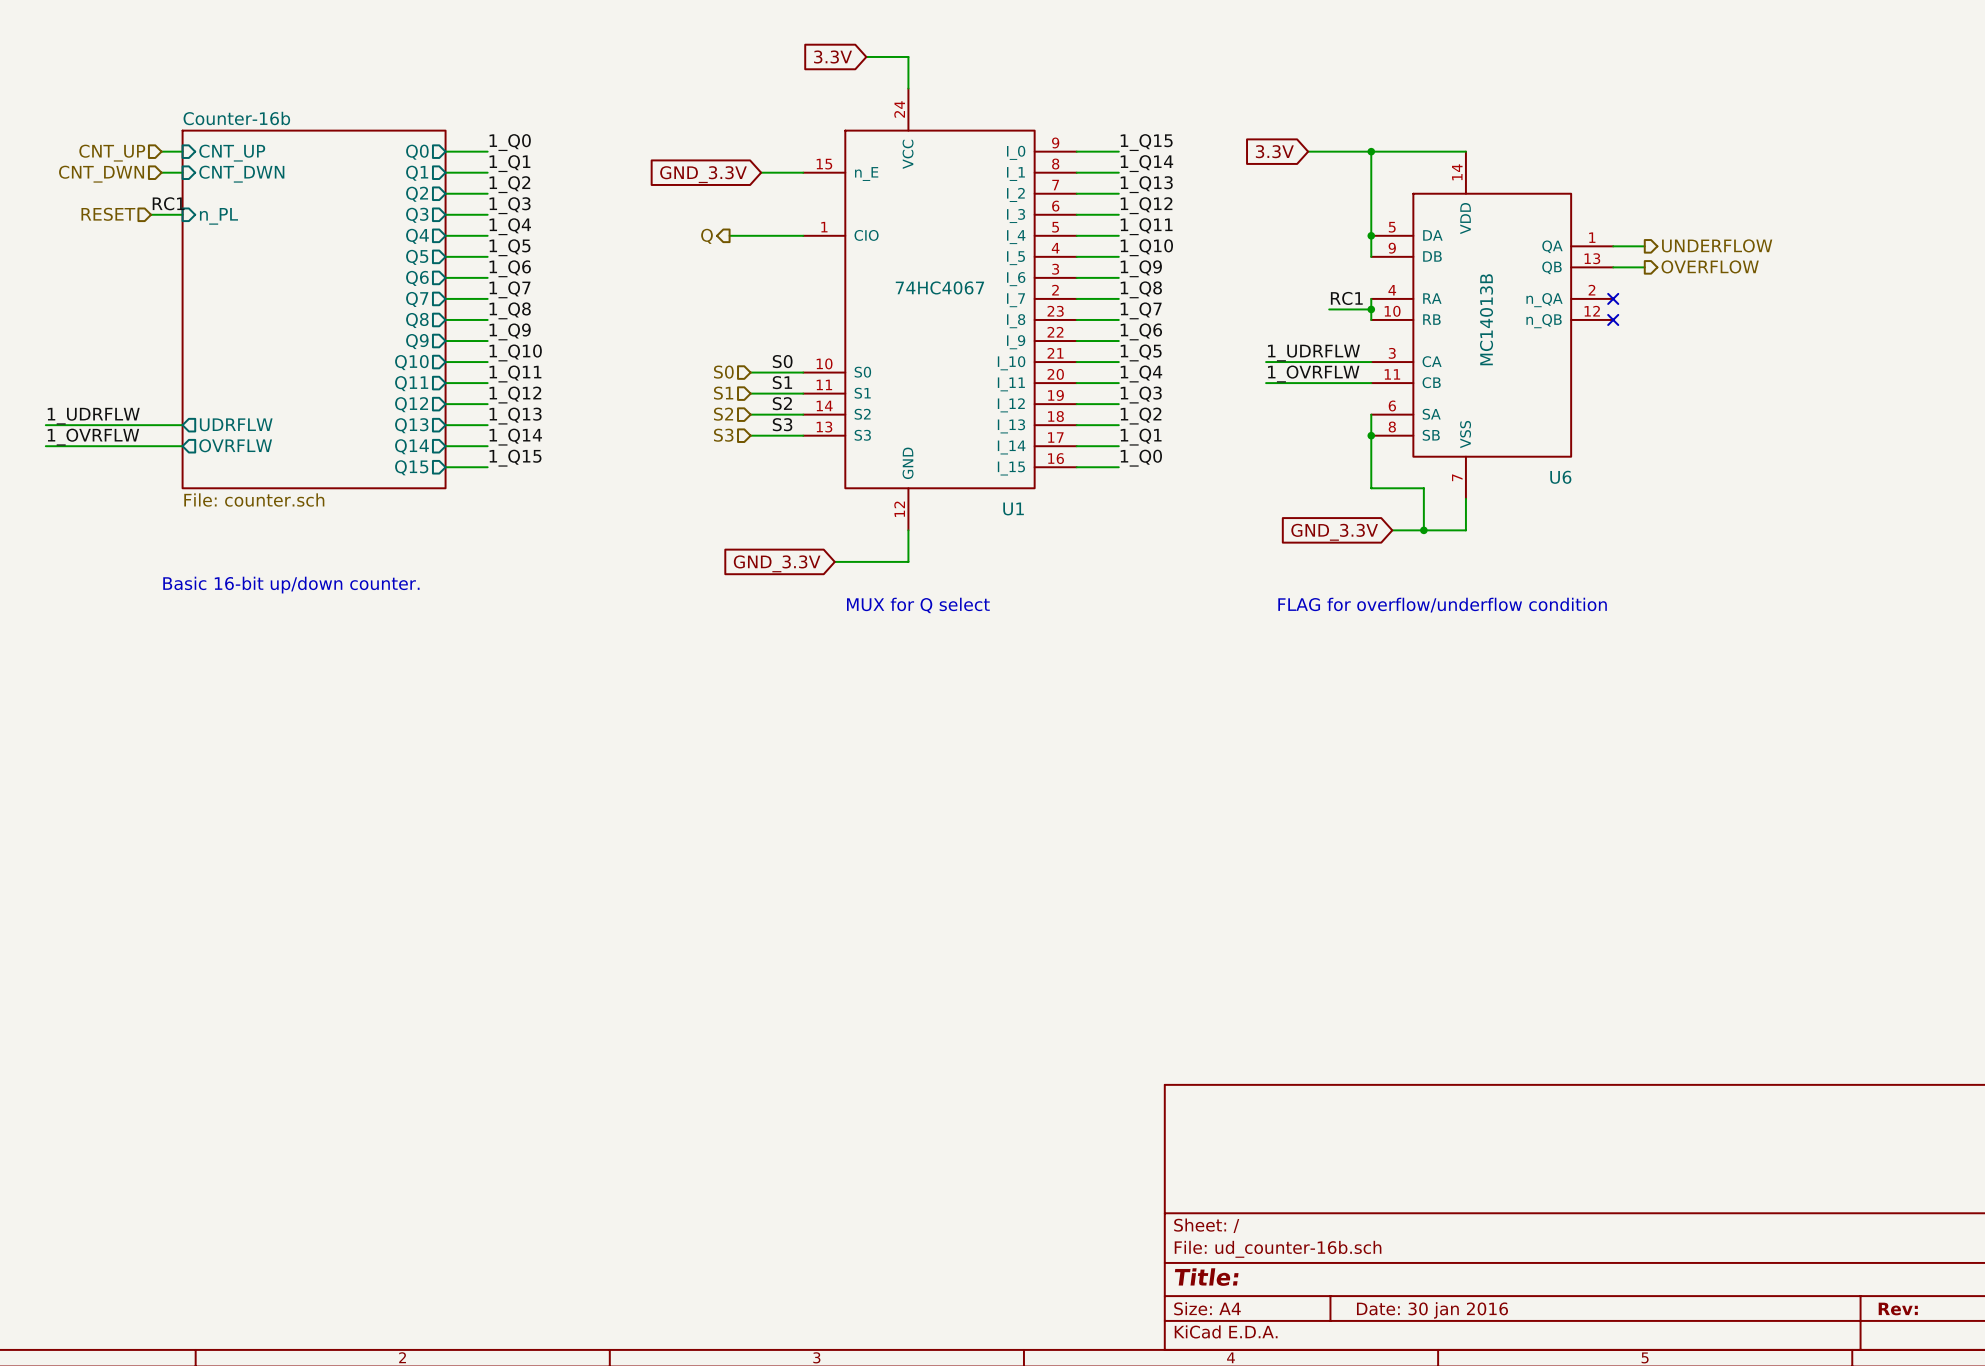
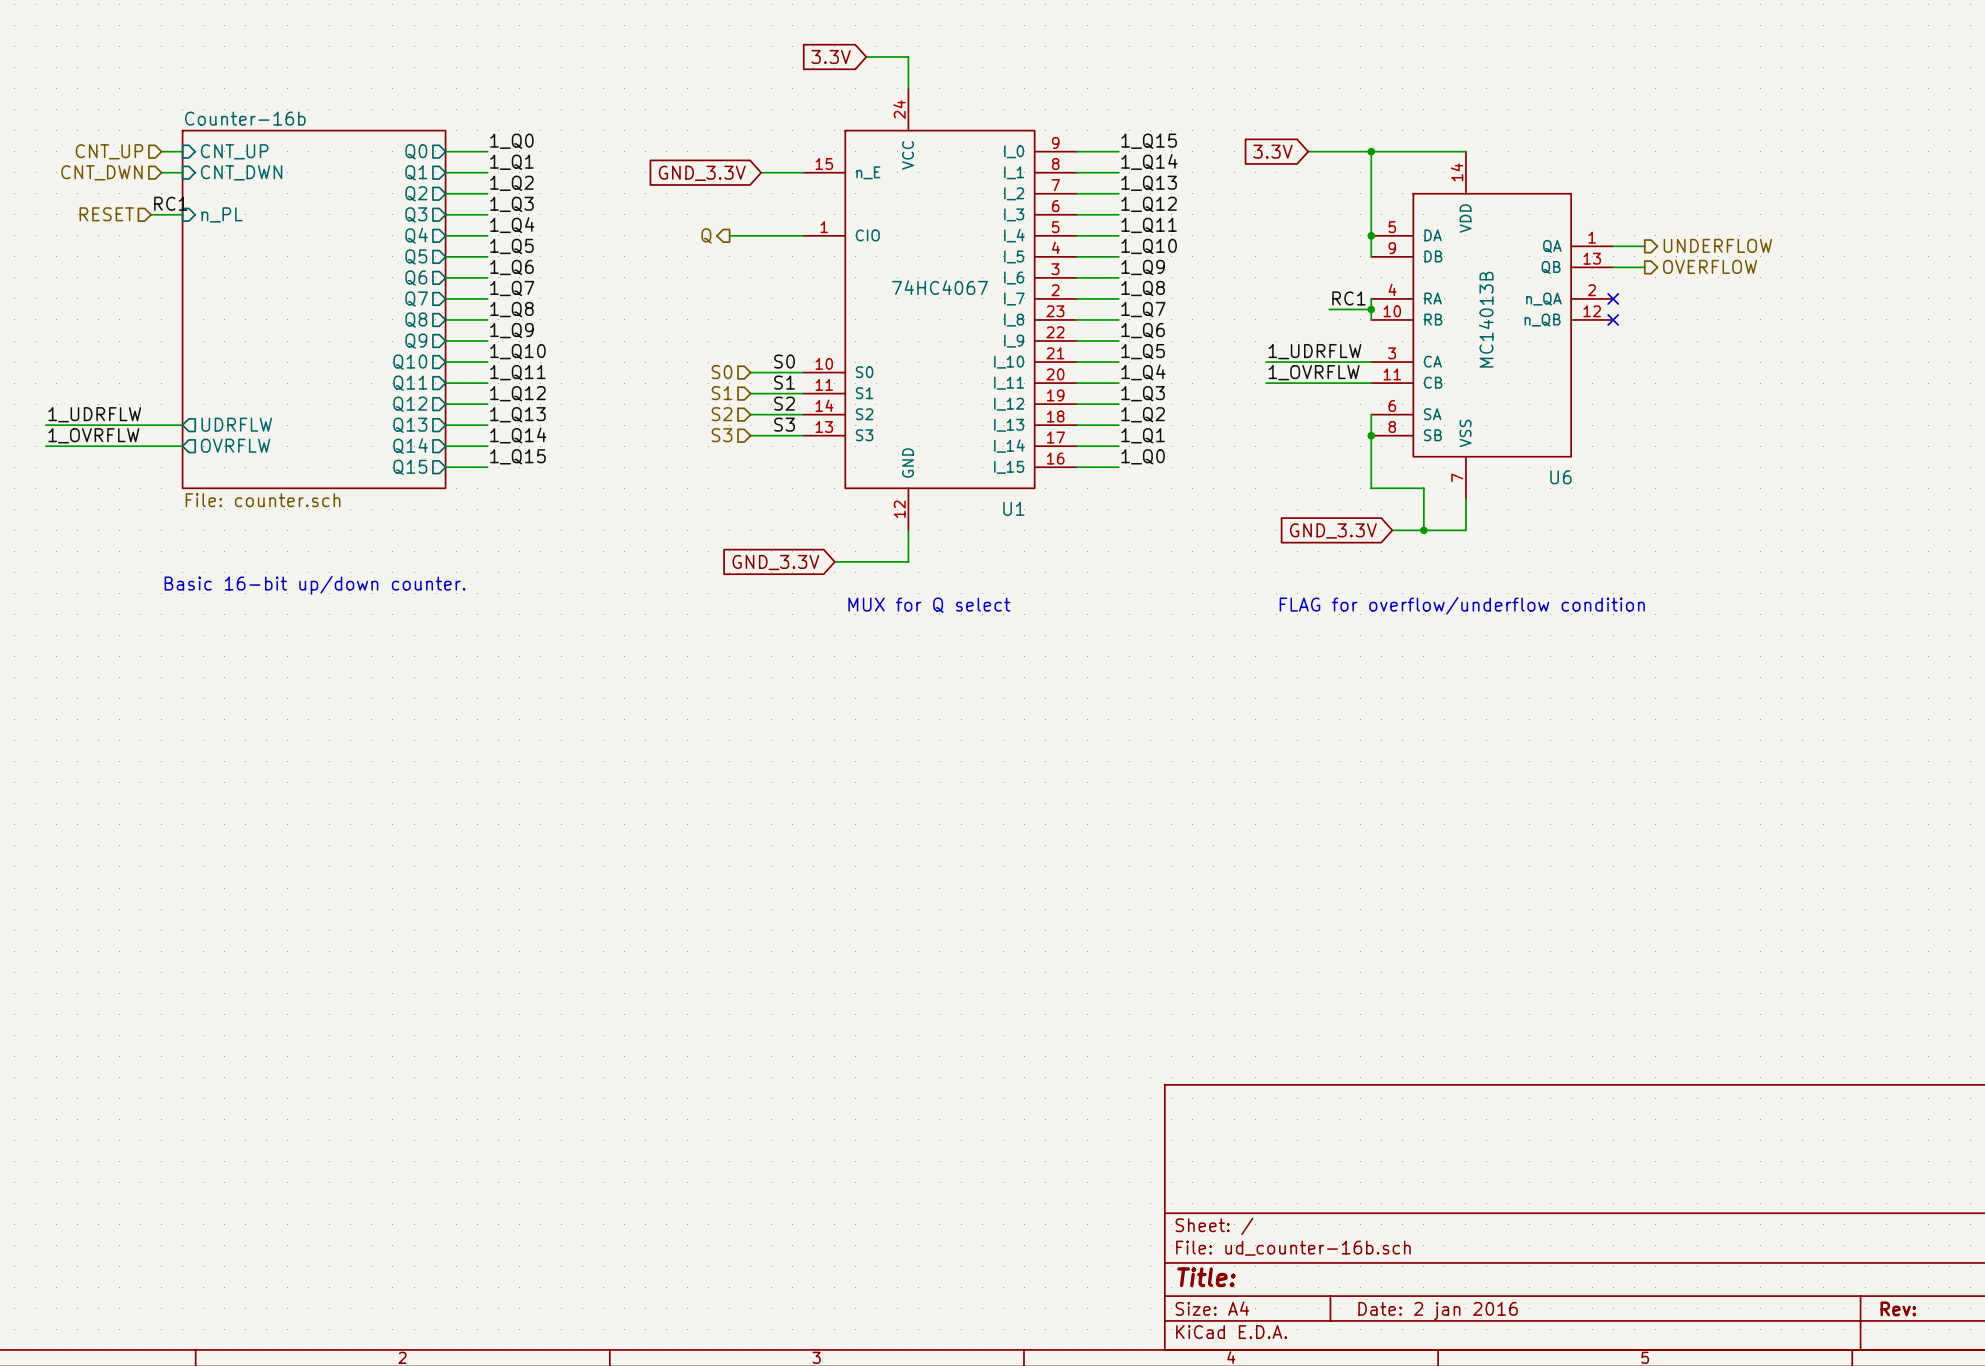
title block: Date: 30 jan 2016 (1432, 1310) -> Date: 2 jan 2016 (1438, 1310)

